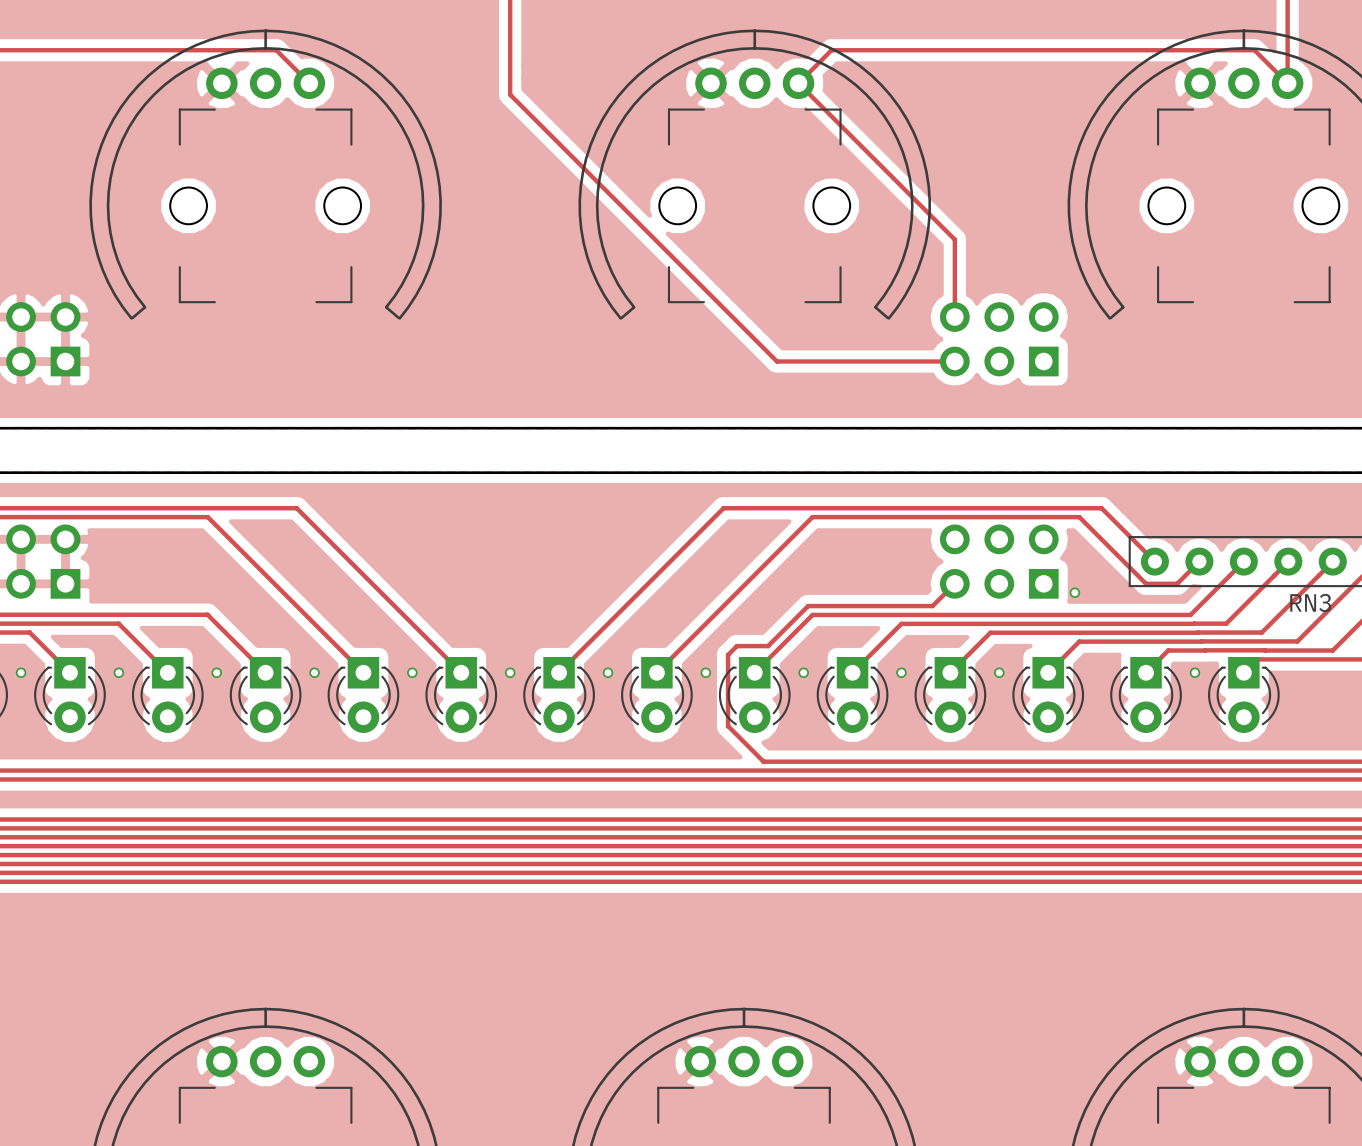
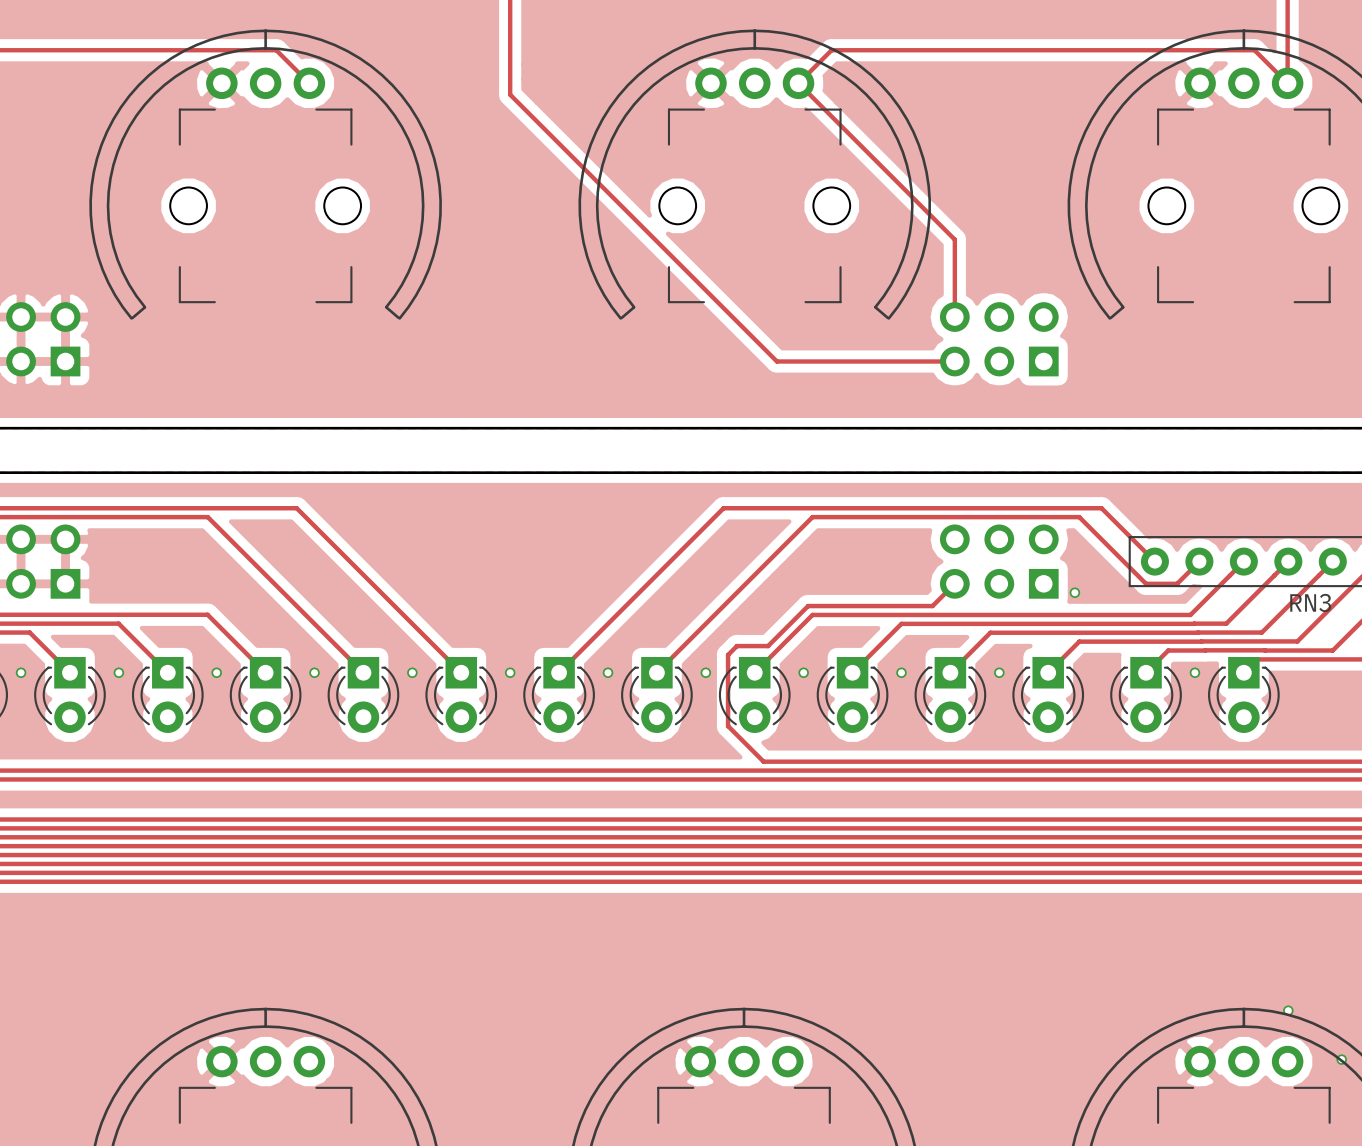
via: none -> (1288, 1010)
via: none -> (1341, 1059)

